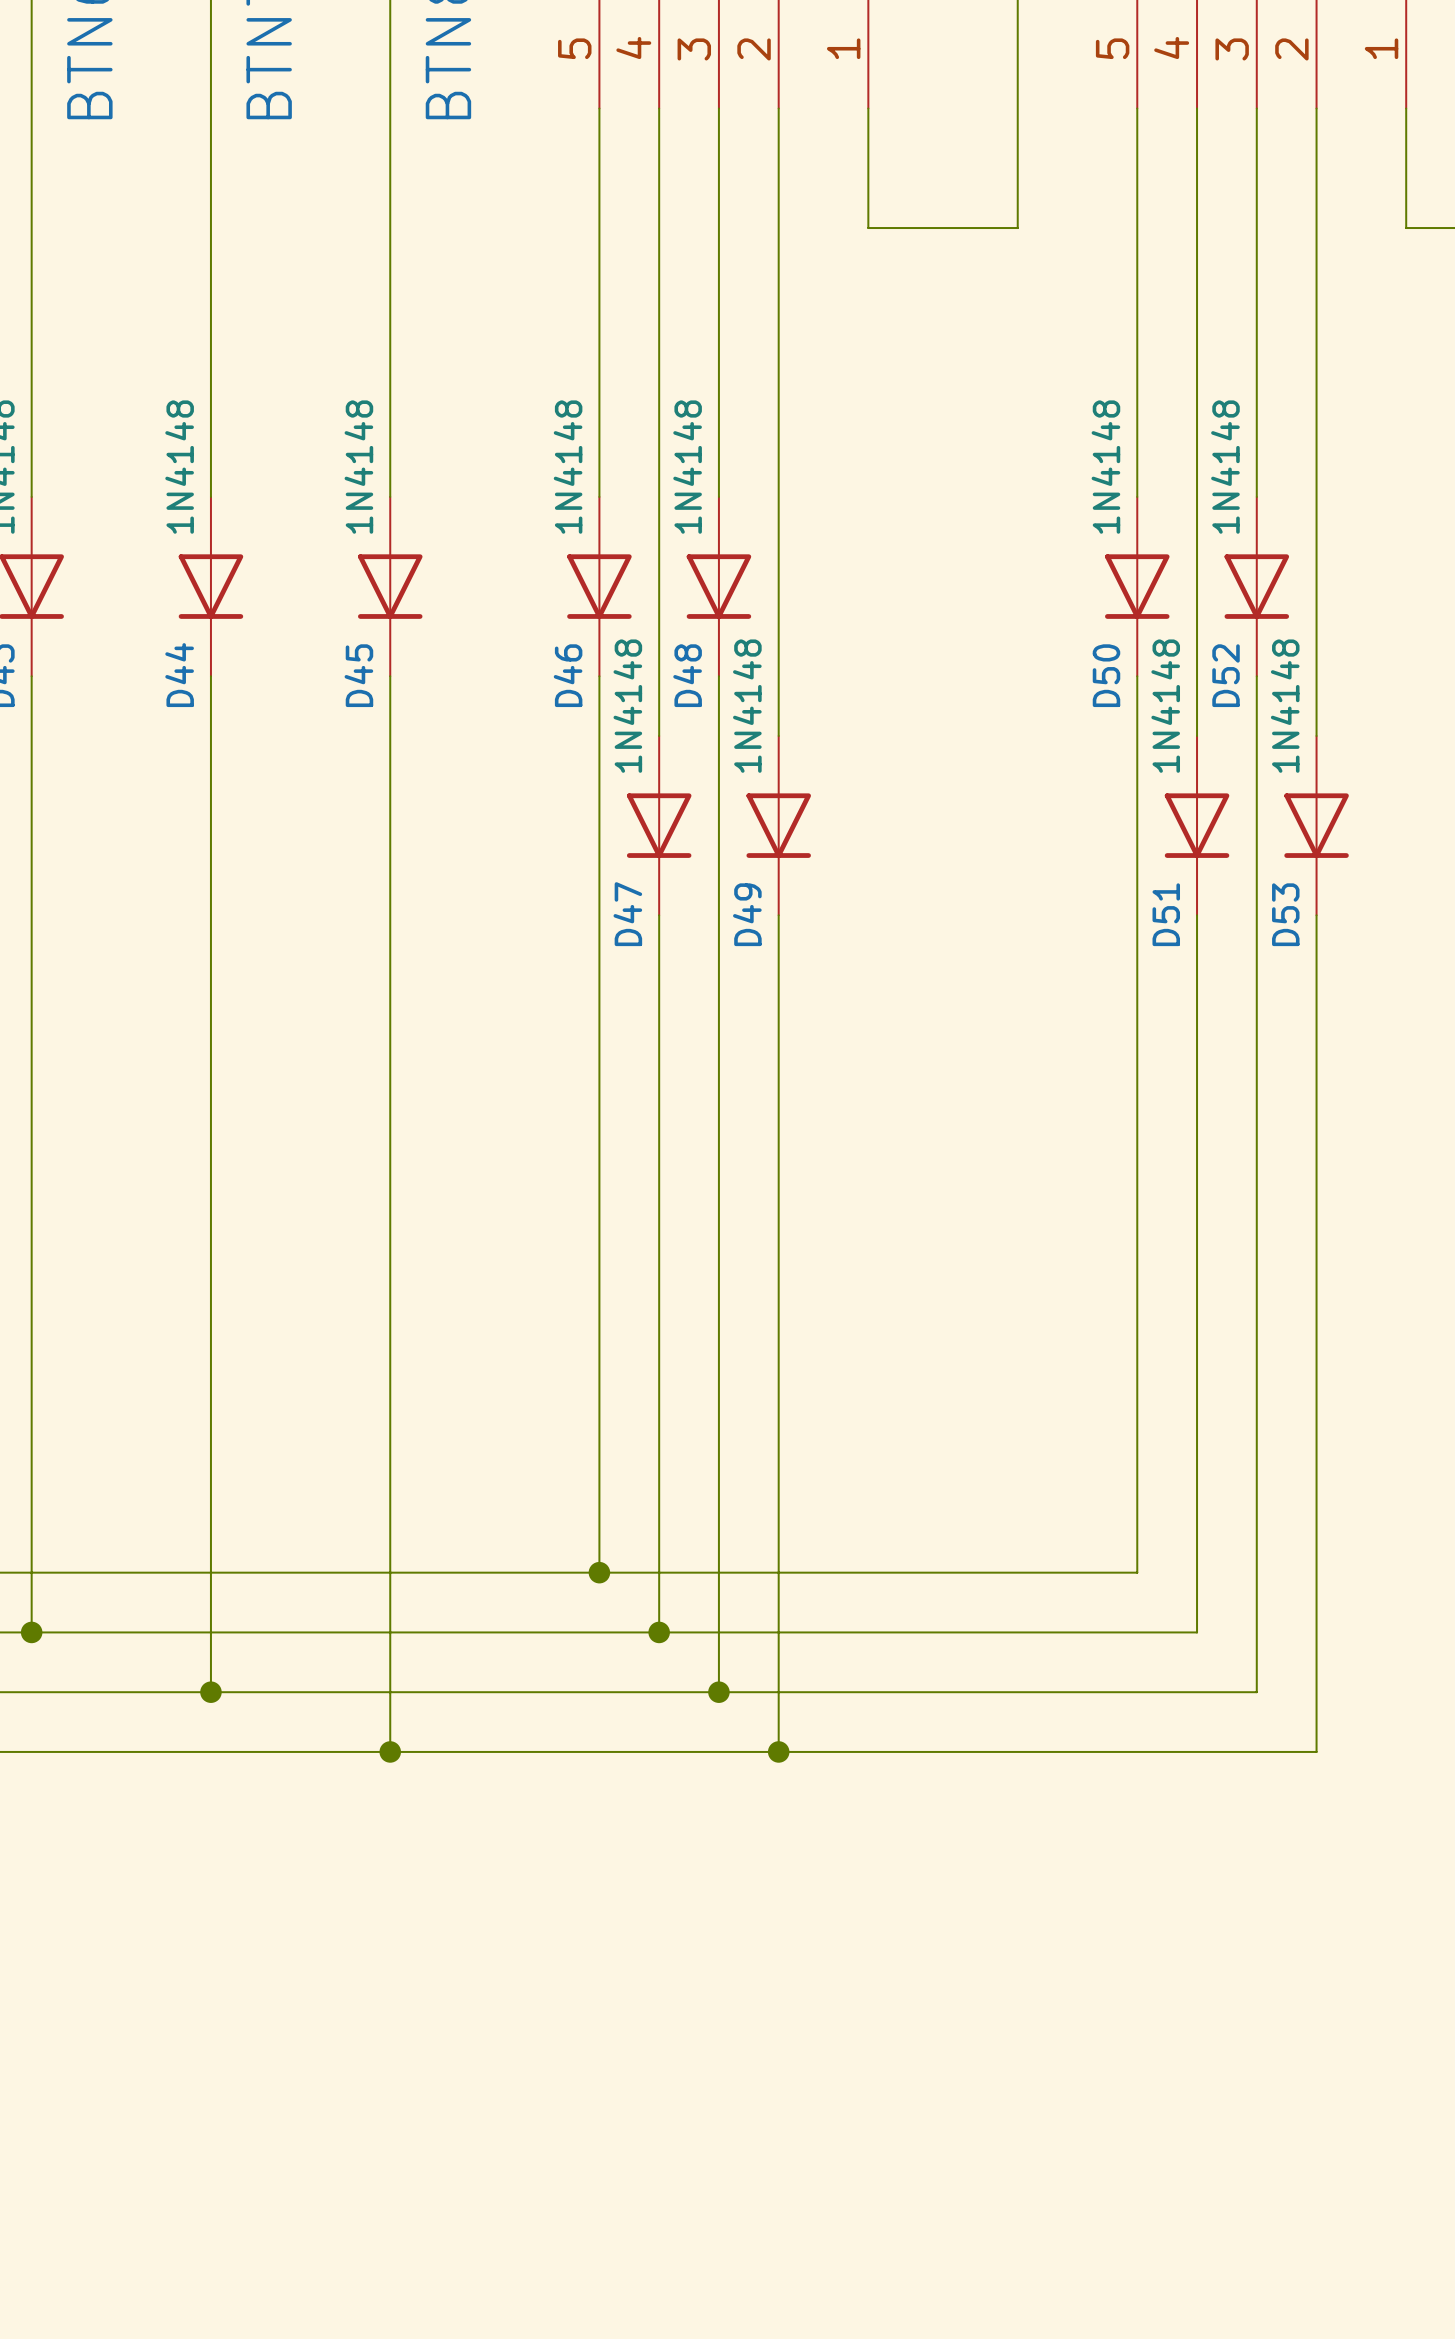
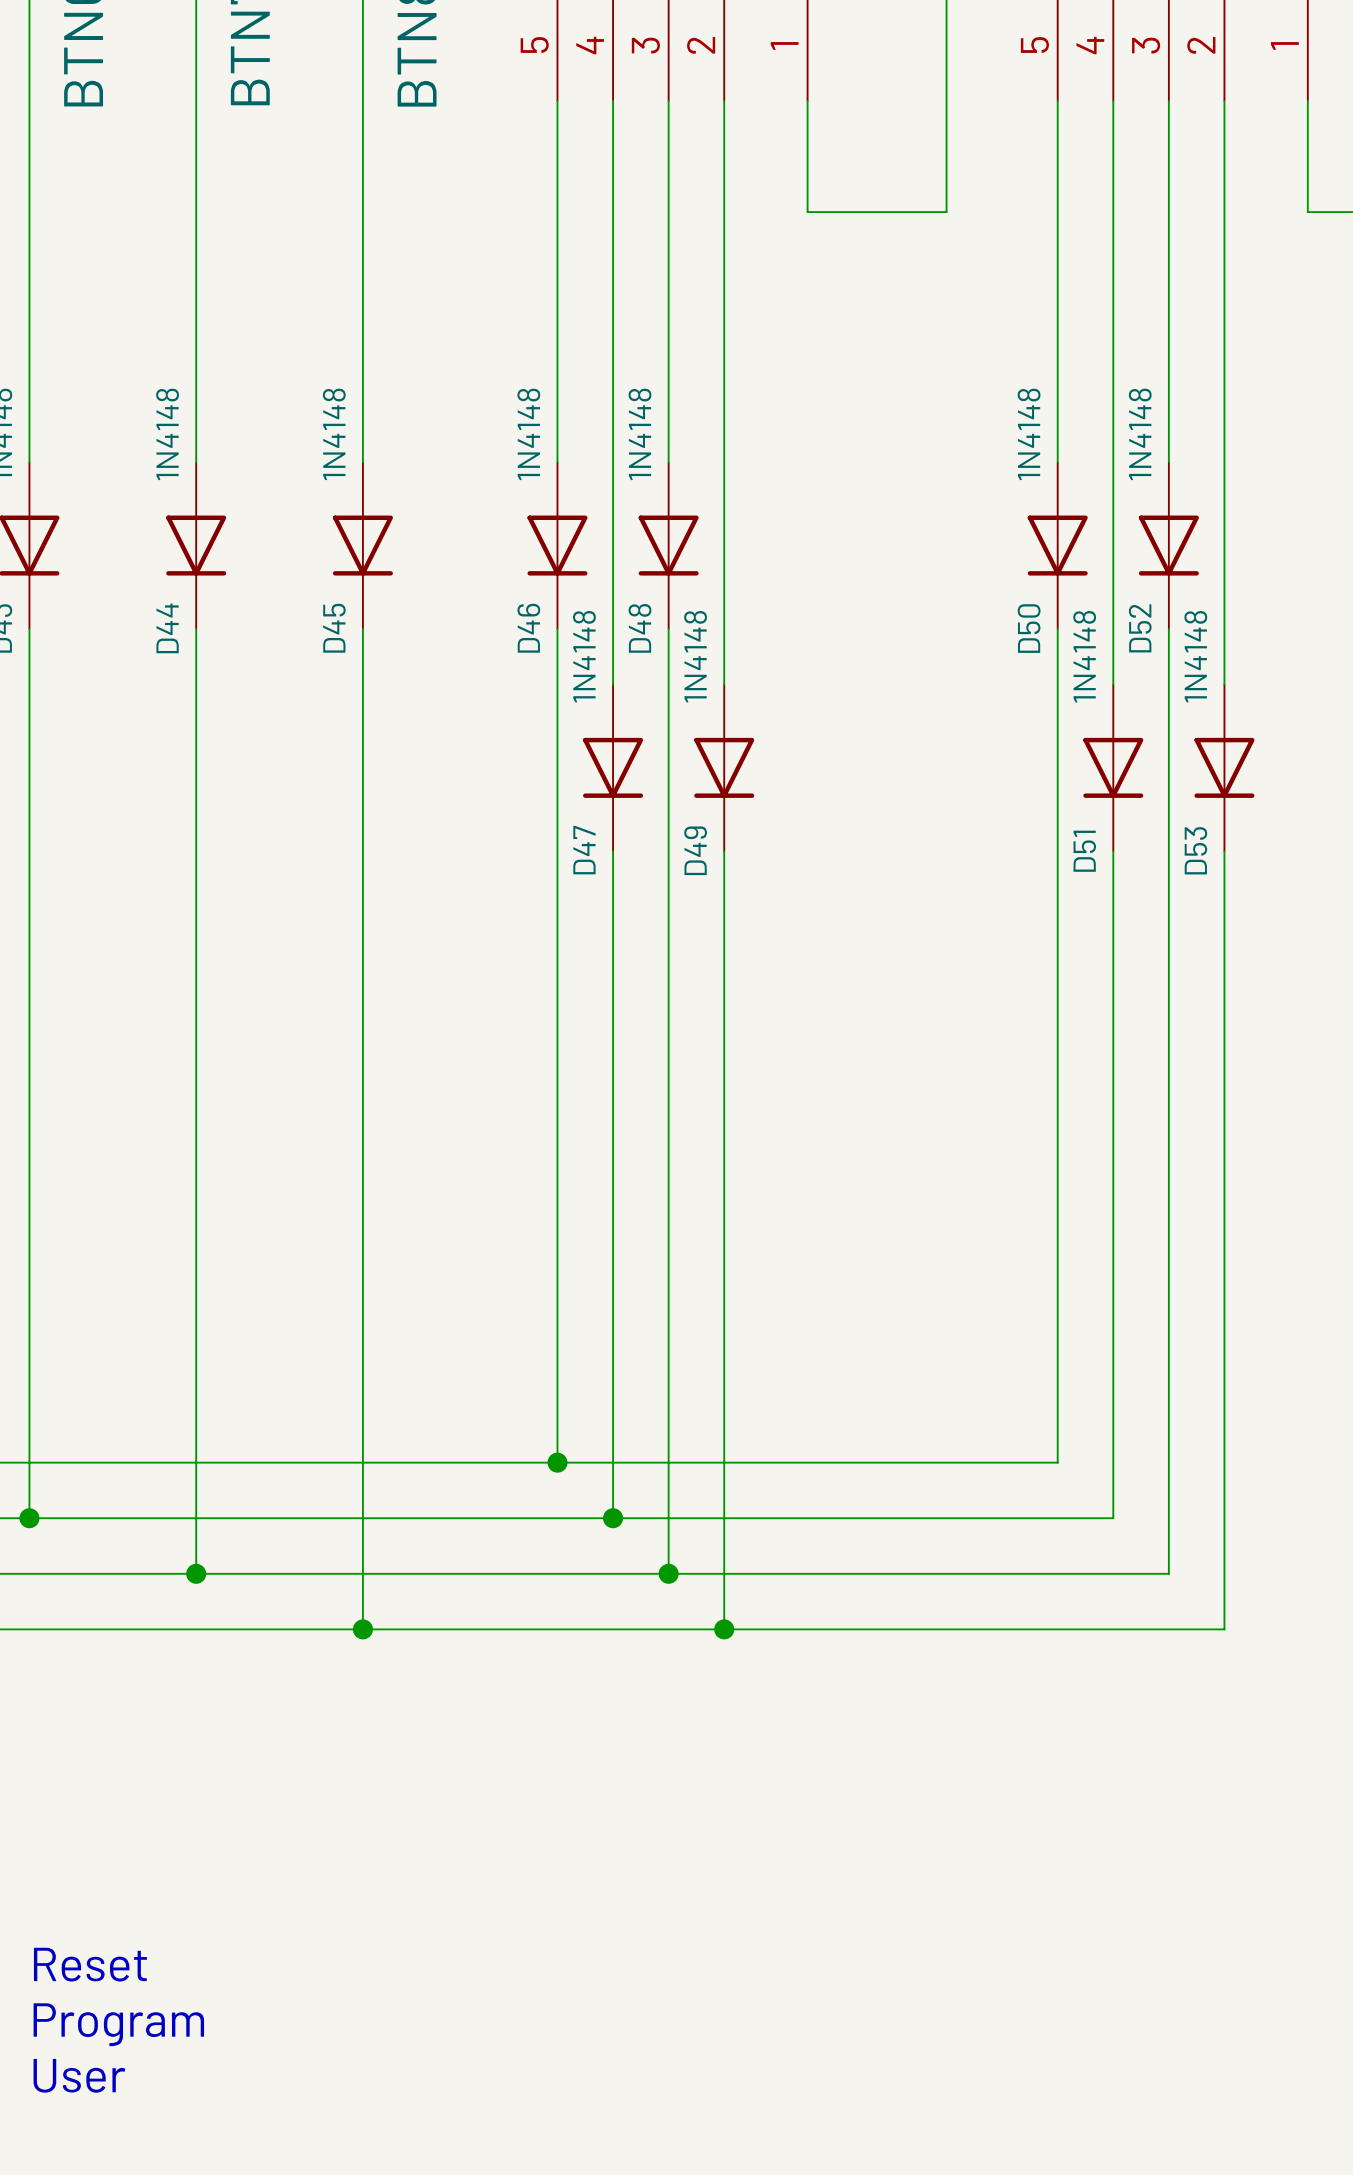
text: none -> Reset (90, 1964)
text: none -> Program (118, 2024)
text: none -> User (79, 2075)

